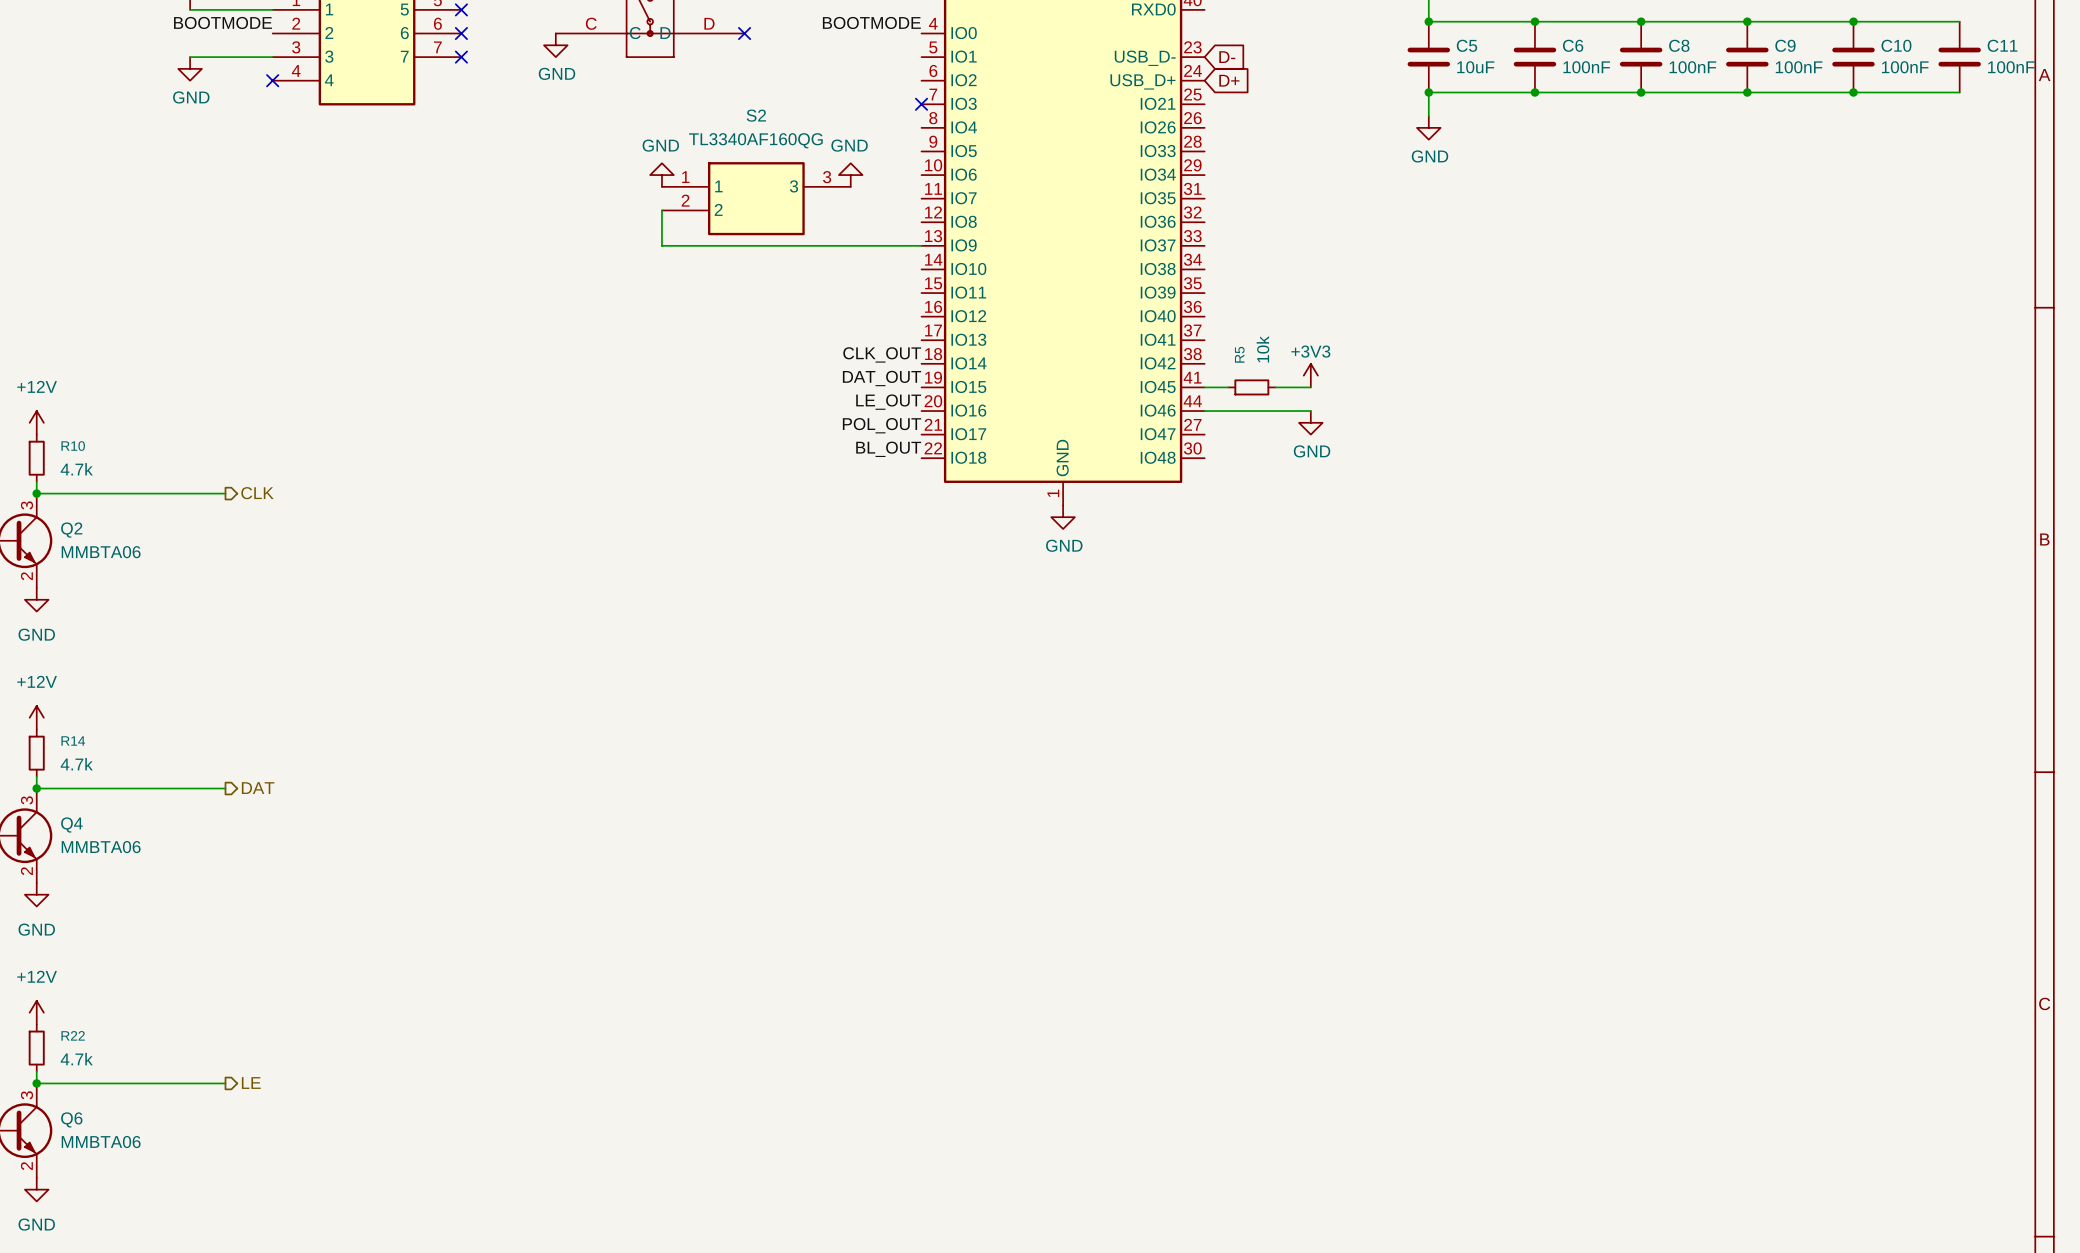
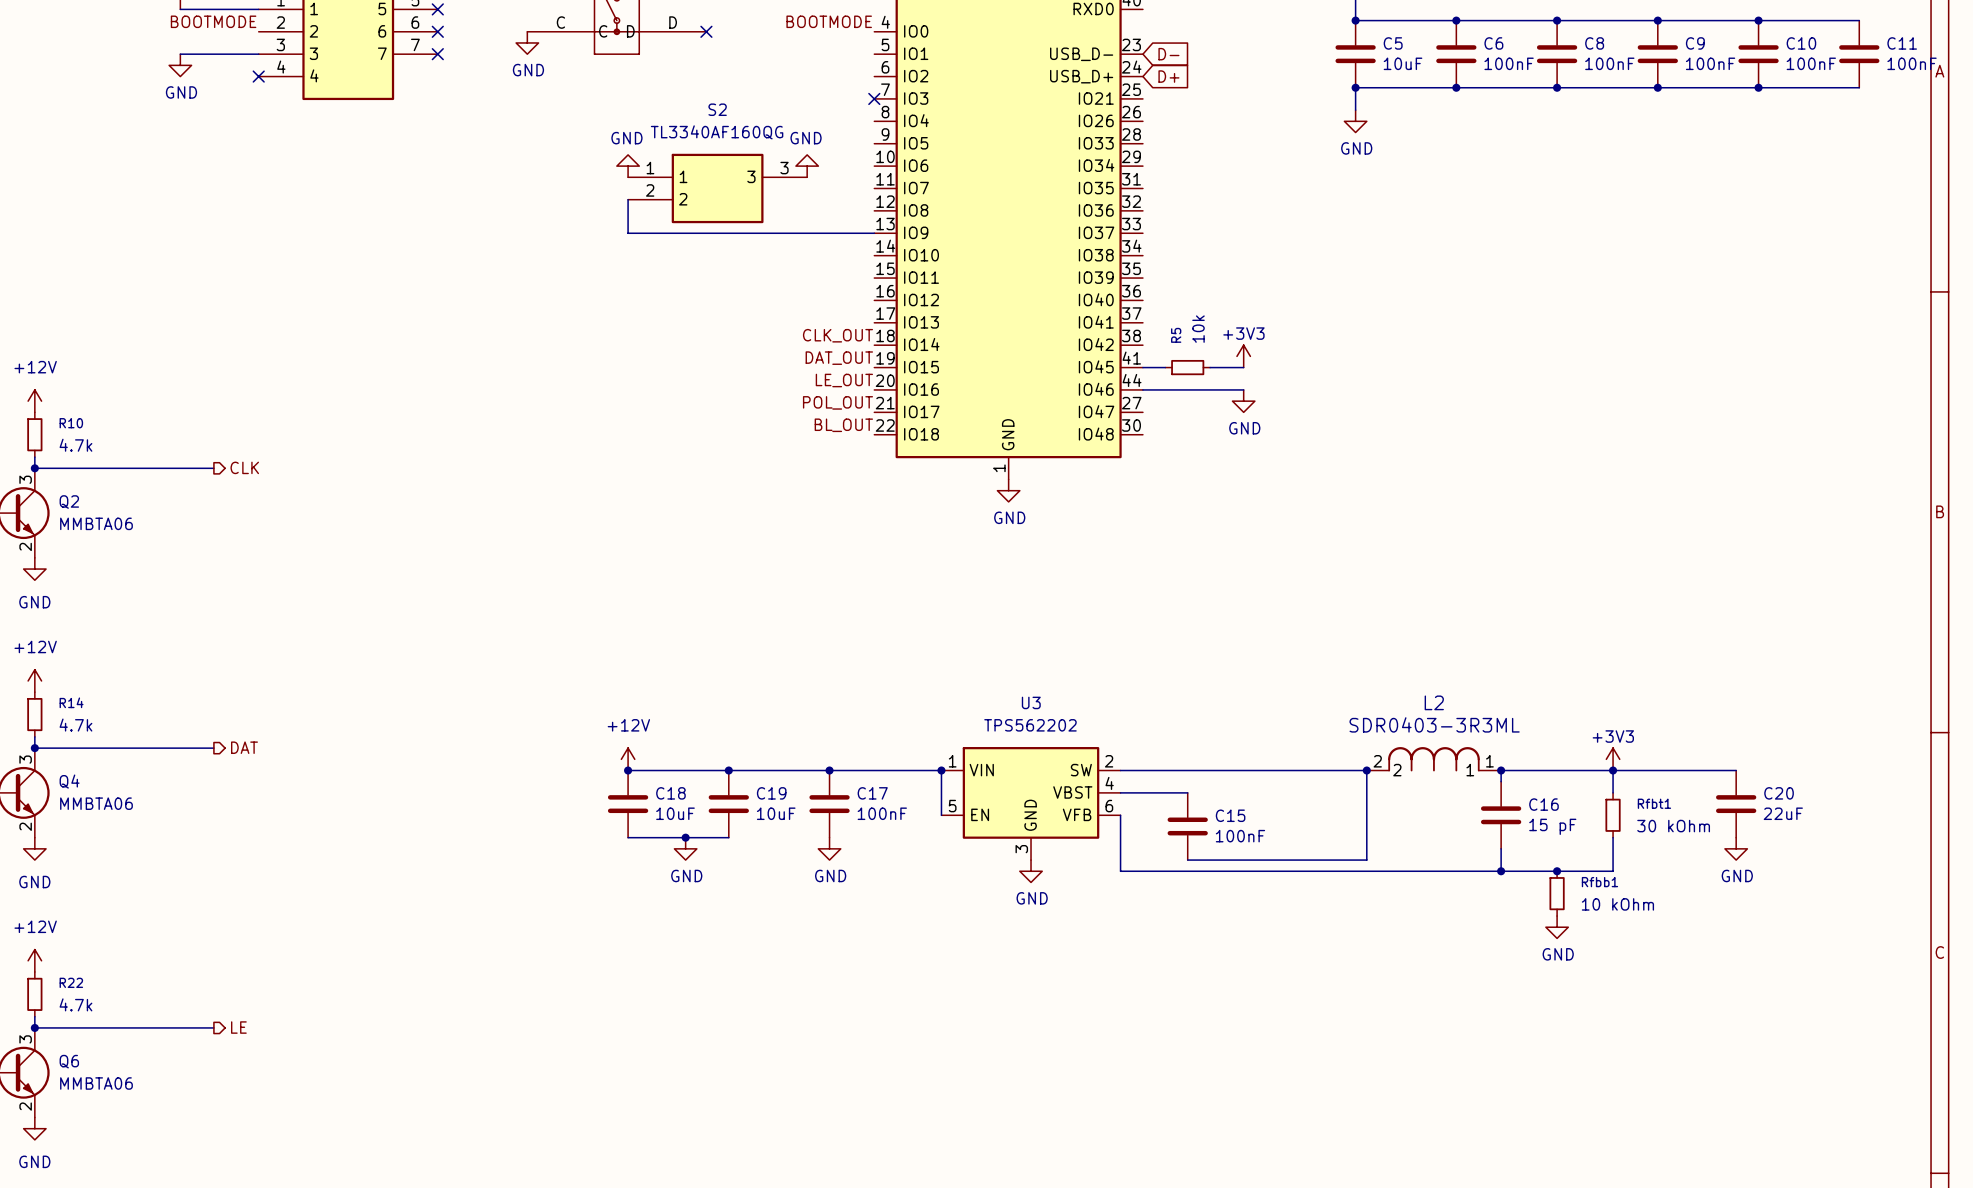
power symbol: none -> +12V (628, 759)
L2: none -> SDR0403-3R3ML (1433, 759)
power symbol: none -> +3V3 (1613, 759)
wire: none -> (628, 770) (941, 770) (941, 815)
junction: none -> (628, 770)
junction: none -> (728, 770)
junction: none -> (829, 770)
junction: none -> (941, 770)
wire: none -> (1120, 770) (1366, 770) (1366, 860) (1187, 860)
junction: none -> (1366, 770)
junction: none -> (1501, 770)
wire: none -> (1613, 770) (1613, 792)
junction: none -> (1613, 770)
wire: none -> (1736, 770) (1501, 770) (1501, 781)
wire: none -> (1120, 792) (1187, 792)
U3: none -> TPS562202 (1031, 803)
C18: none -> 10uF (628, 804)
C19: none -> 10uF (728, 804)
C17: none -> 100nF (829, 804)
C20: none -> 22uF (1736, 804)
wire: none -> (1120, 815) (1120, 871) (1613, 871) (1613, 837)
C16: none -> 15 pF (1501, 815)
Rfbt1: none -> 30 kOhm (1613, 815)
C15: none -> 100nF (1187, 826)
wire: none -> (628, 837) (728, 837)
junction: none -> (685, 837)
power symbol: none -> GND (685, 848)
power symbol: none -> GND (829, 848)
wire: none -> (1501, 848) (1501, 871)
power symbol: none -> GND (1736, 848)
power symbol: none -> GND (1031, 871)
junction: none -> (1501, 871)
junction: none -> (1557, 871)
Rfbb1: none -> 10 kOhm (1557, 893)
power symbol: none -> GND (1557, 927)

